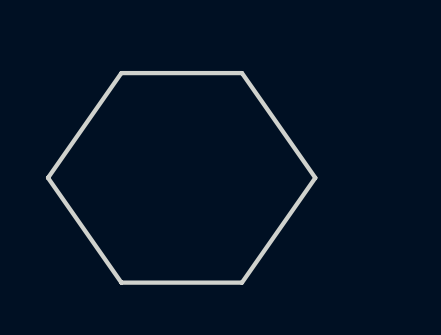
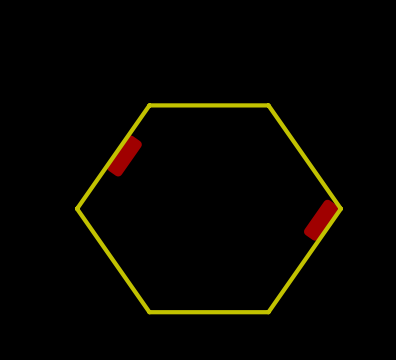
part: none -> (124, 155)
part: none -> (321, 220)

